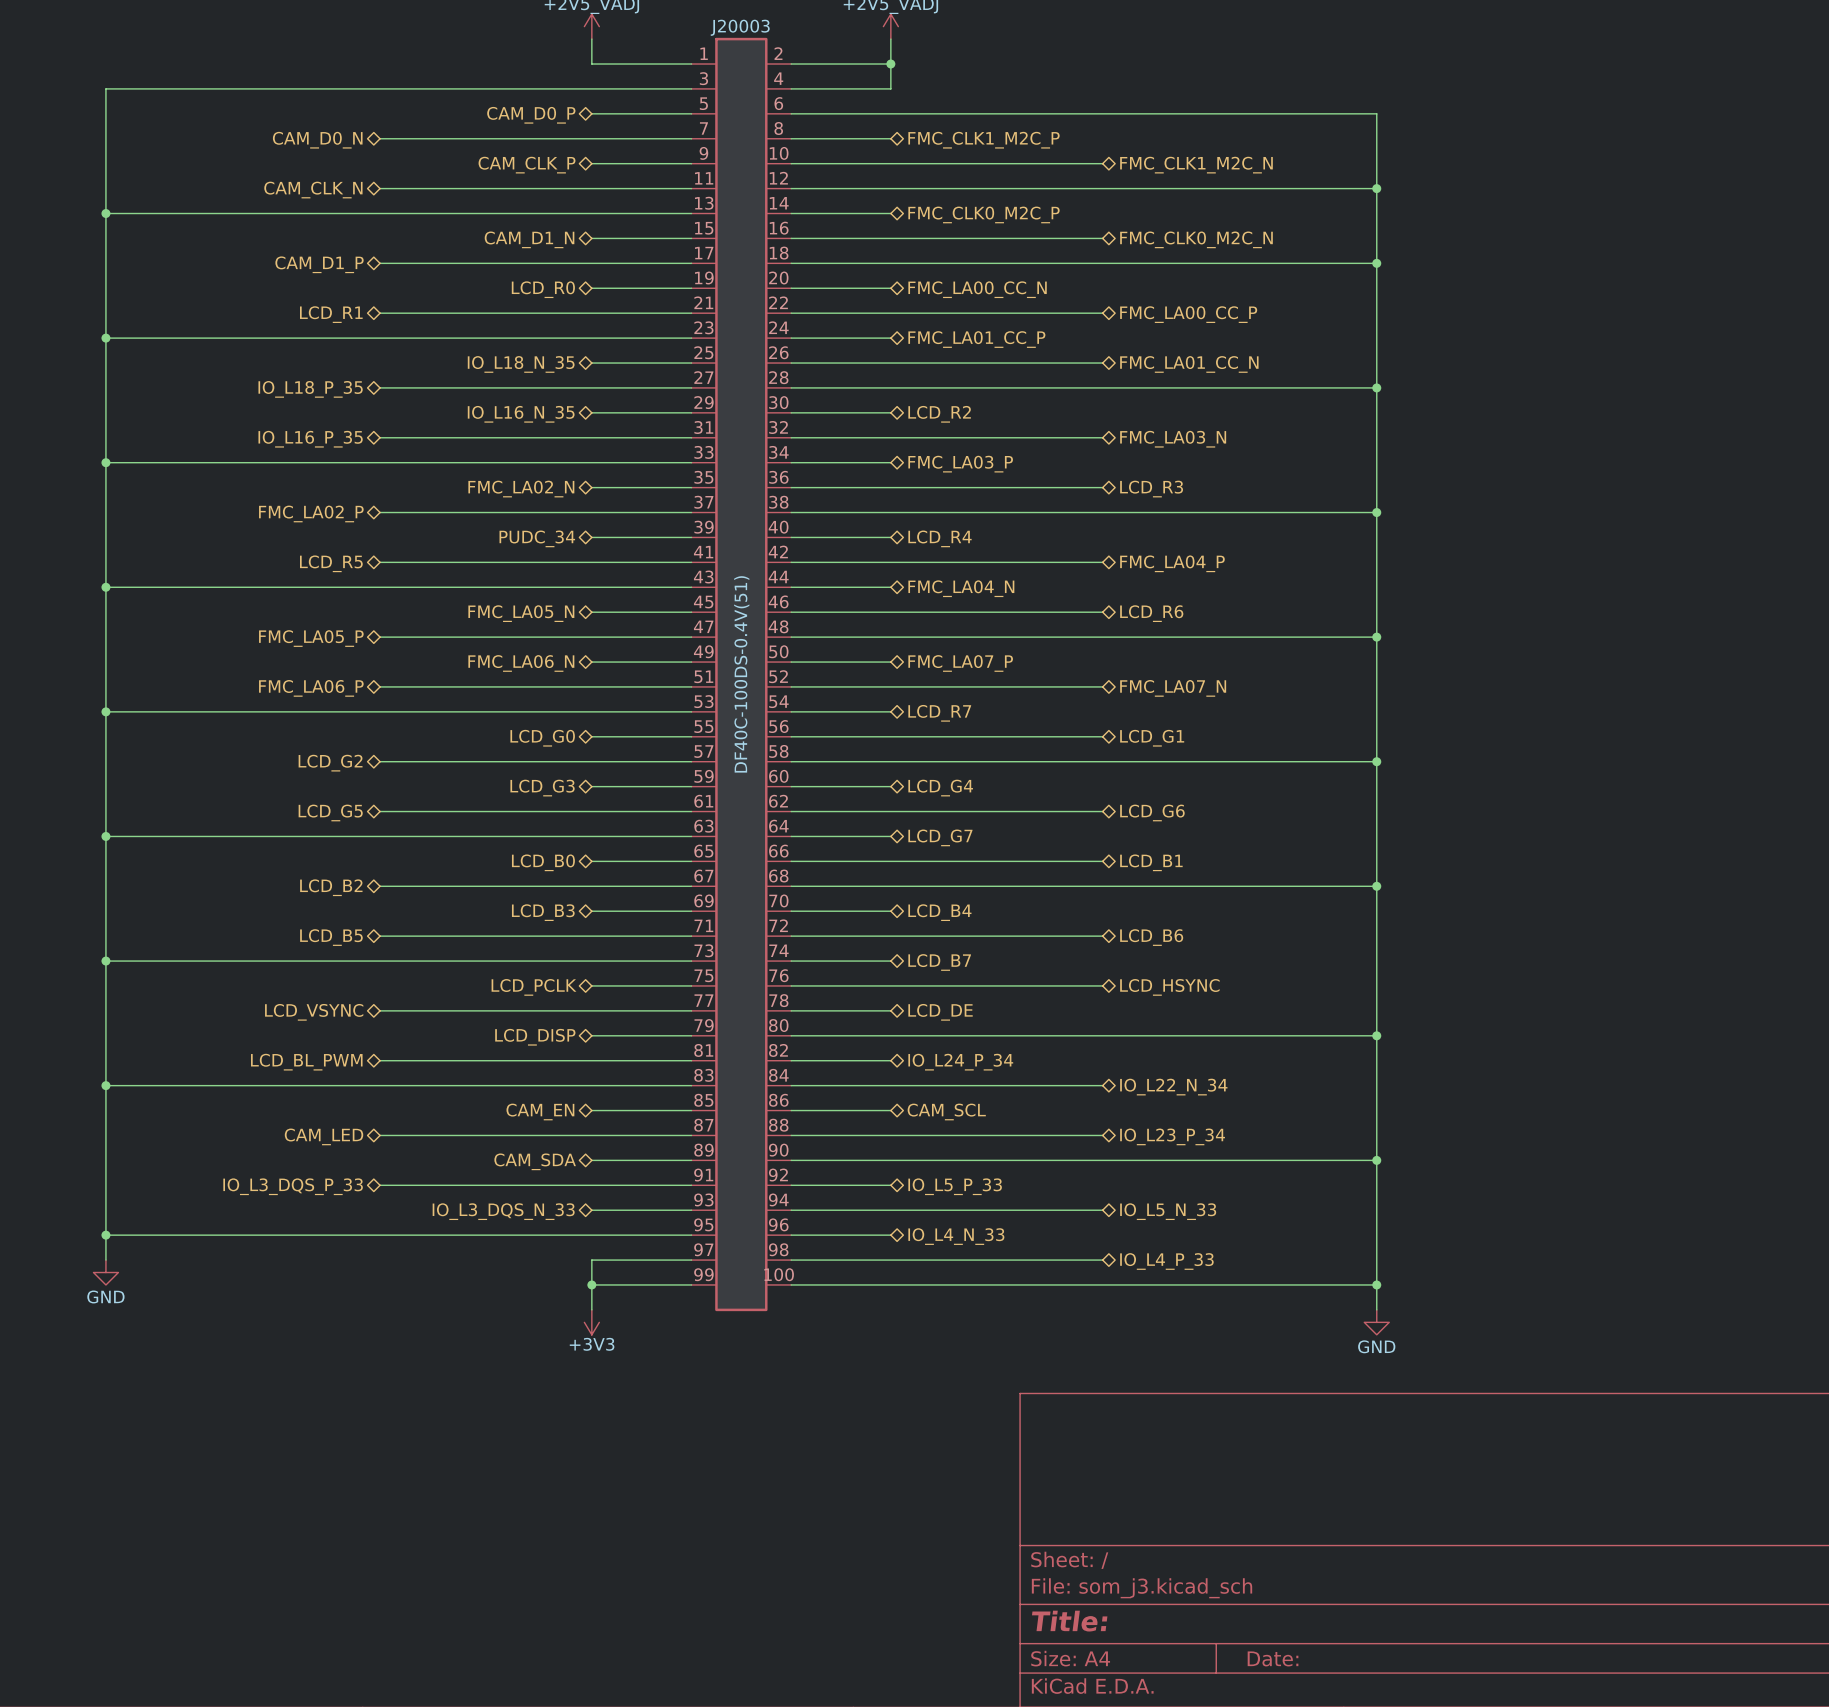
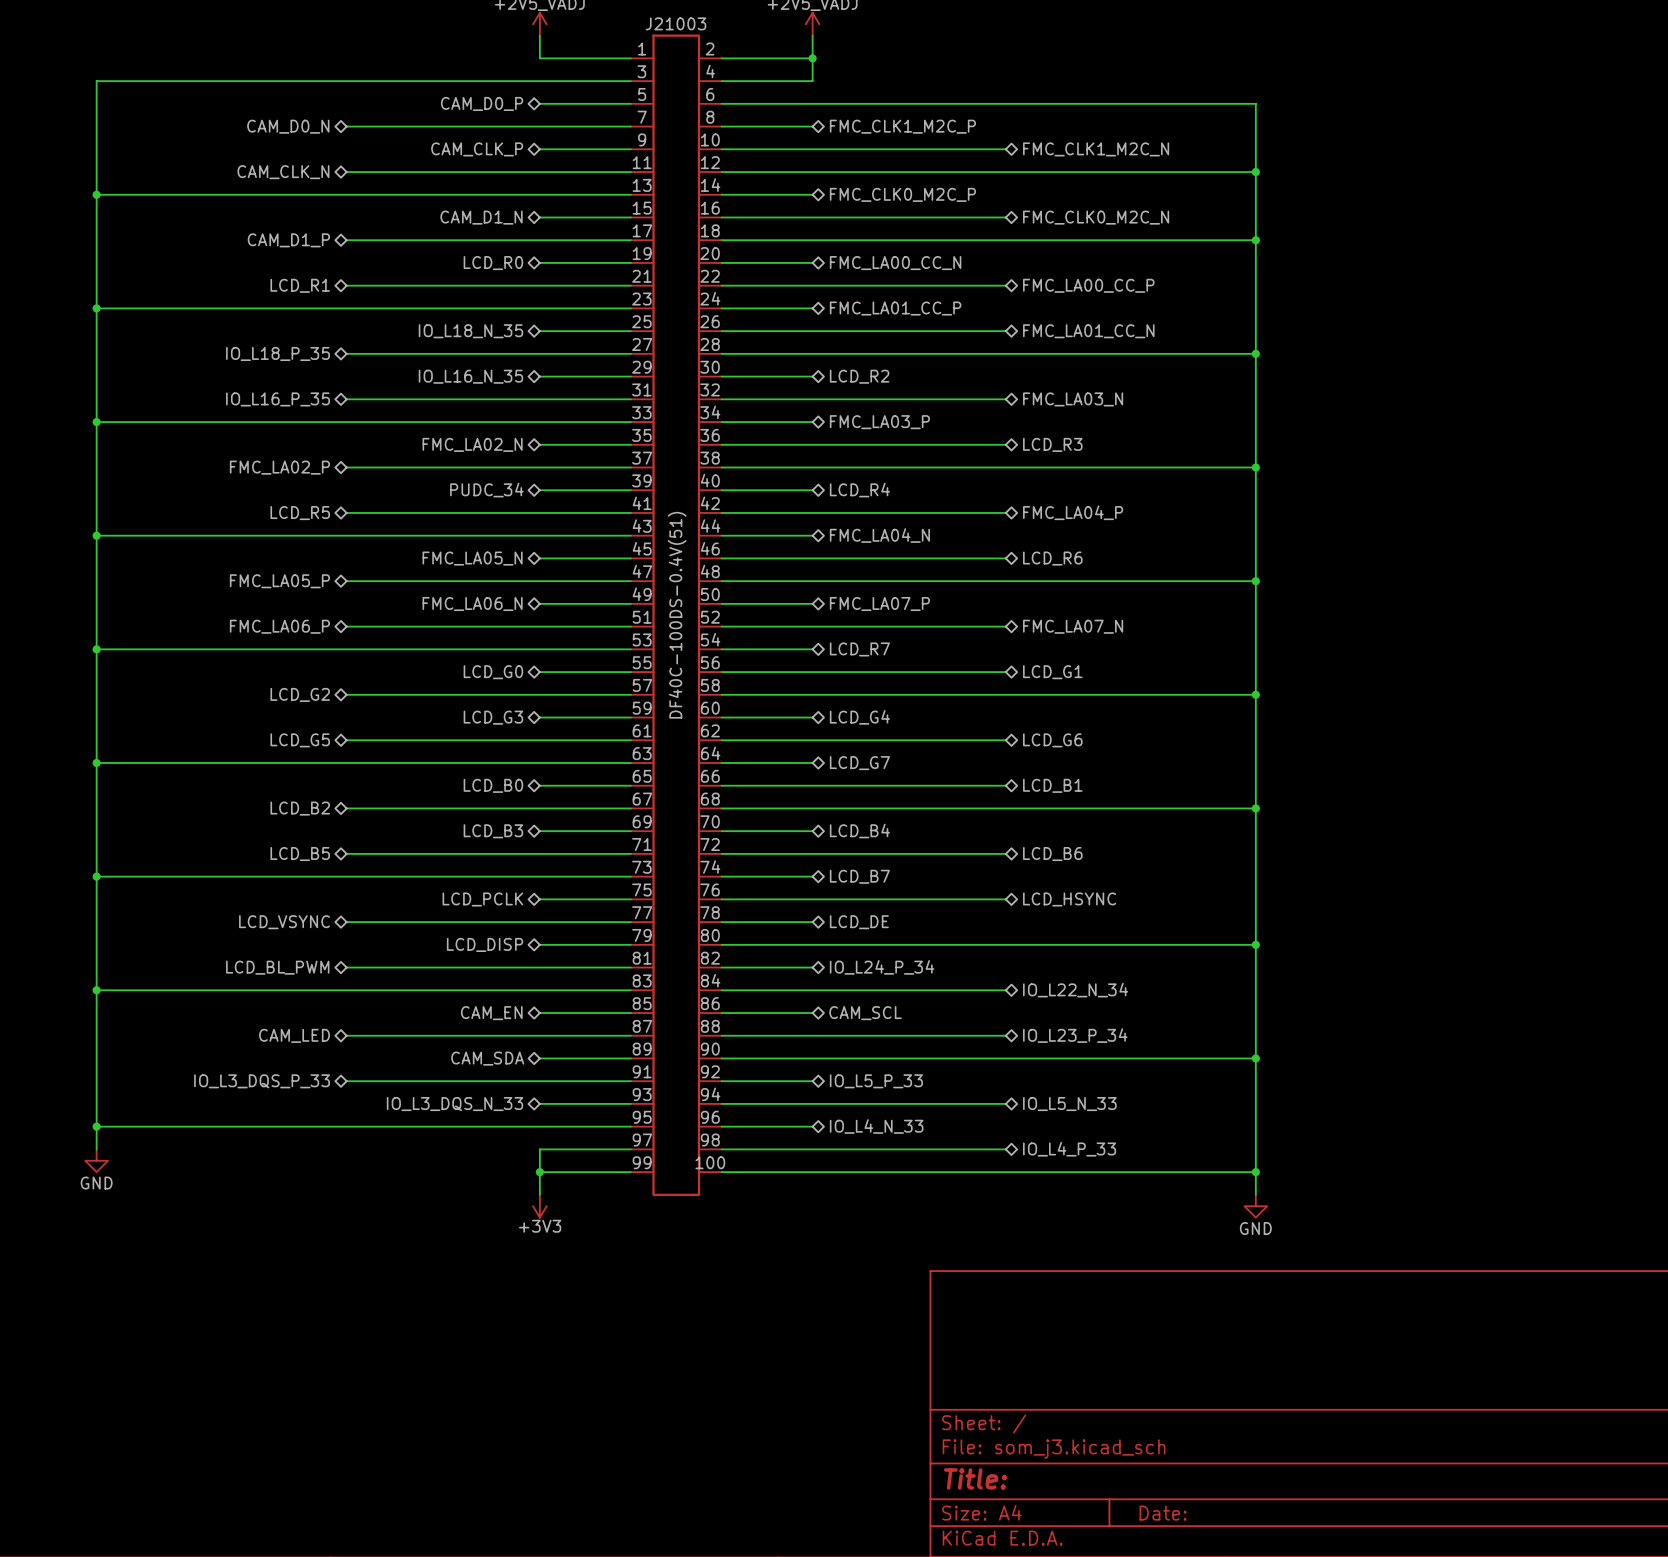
J20003 name: J20003 (740, 27) -> J21003 (675, 23)

